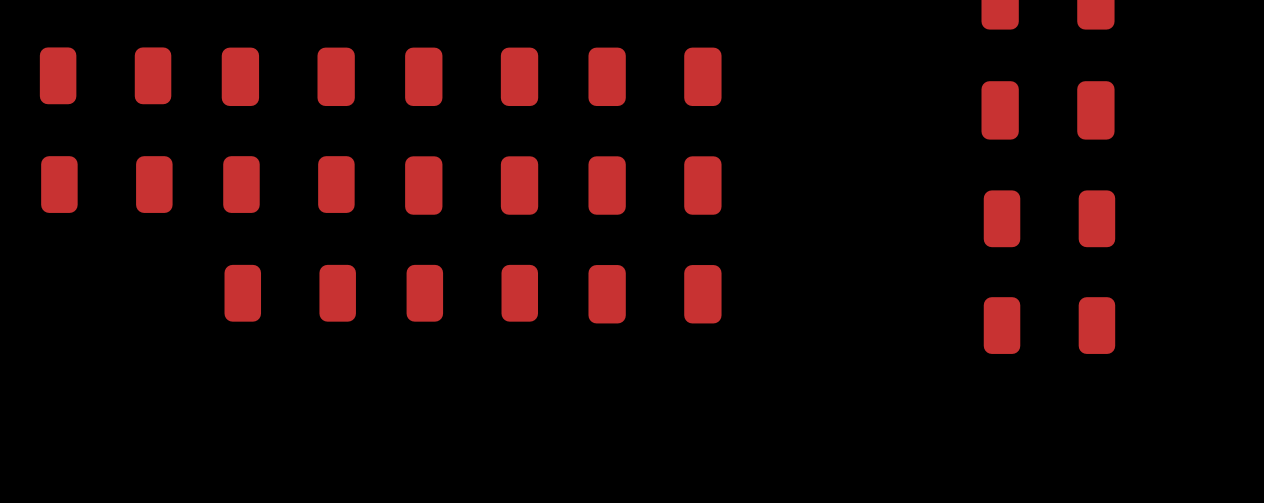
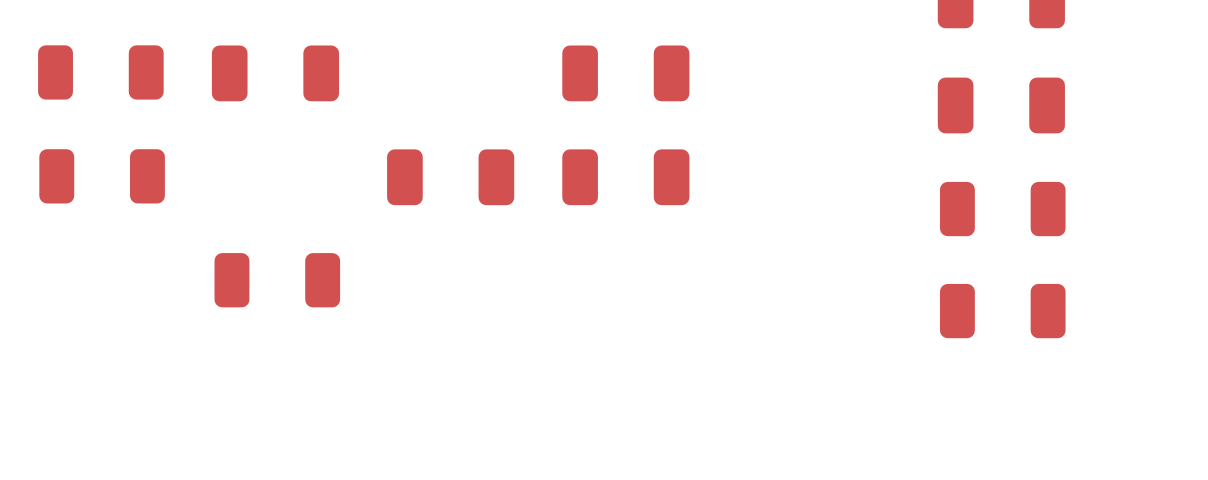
part: (471, 76) -> none
part: (288, 184) -> none
part: (472, 293) -> none
part: (655, 294) -> none

